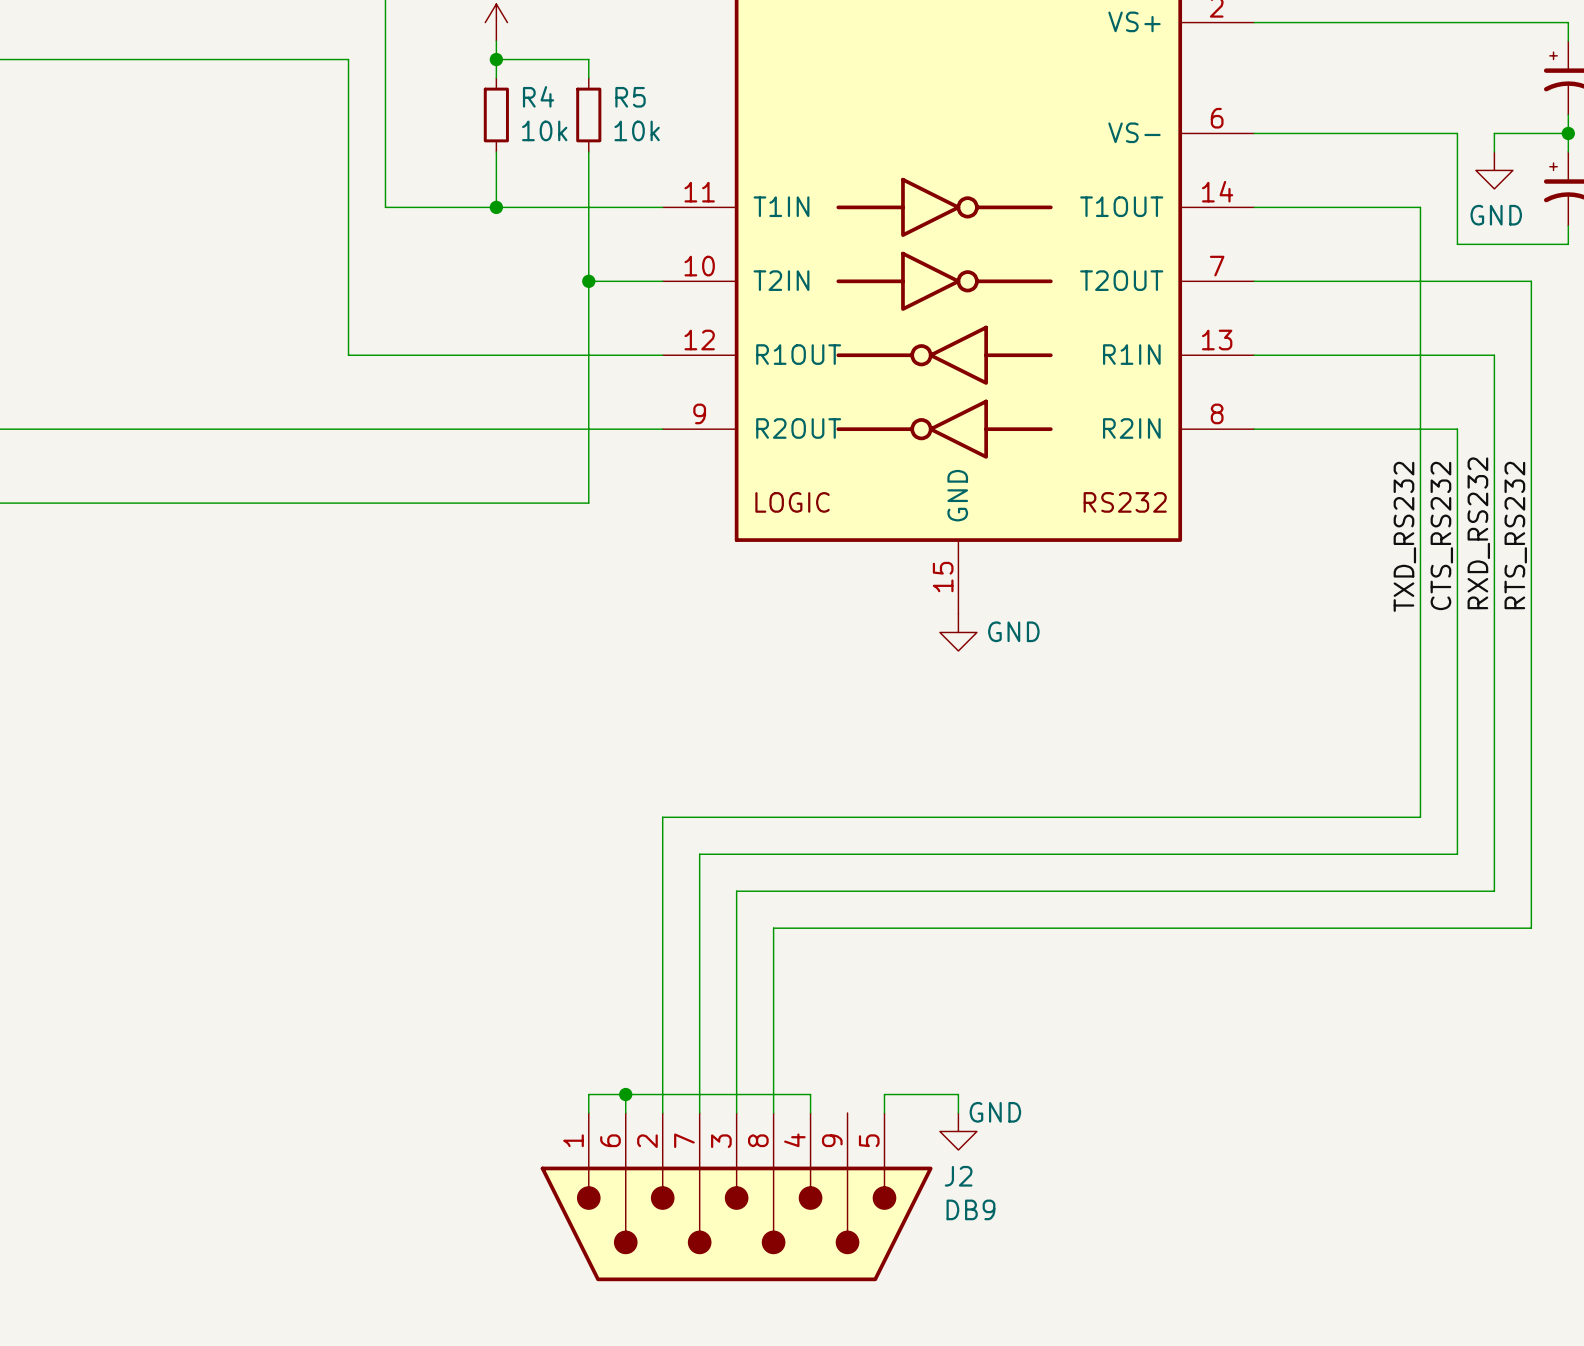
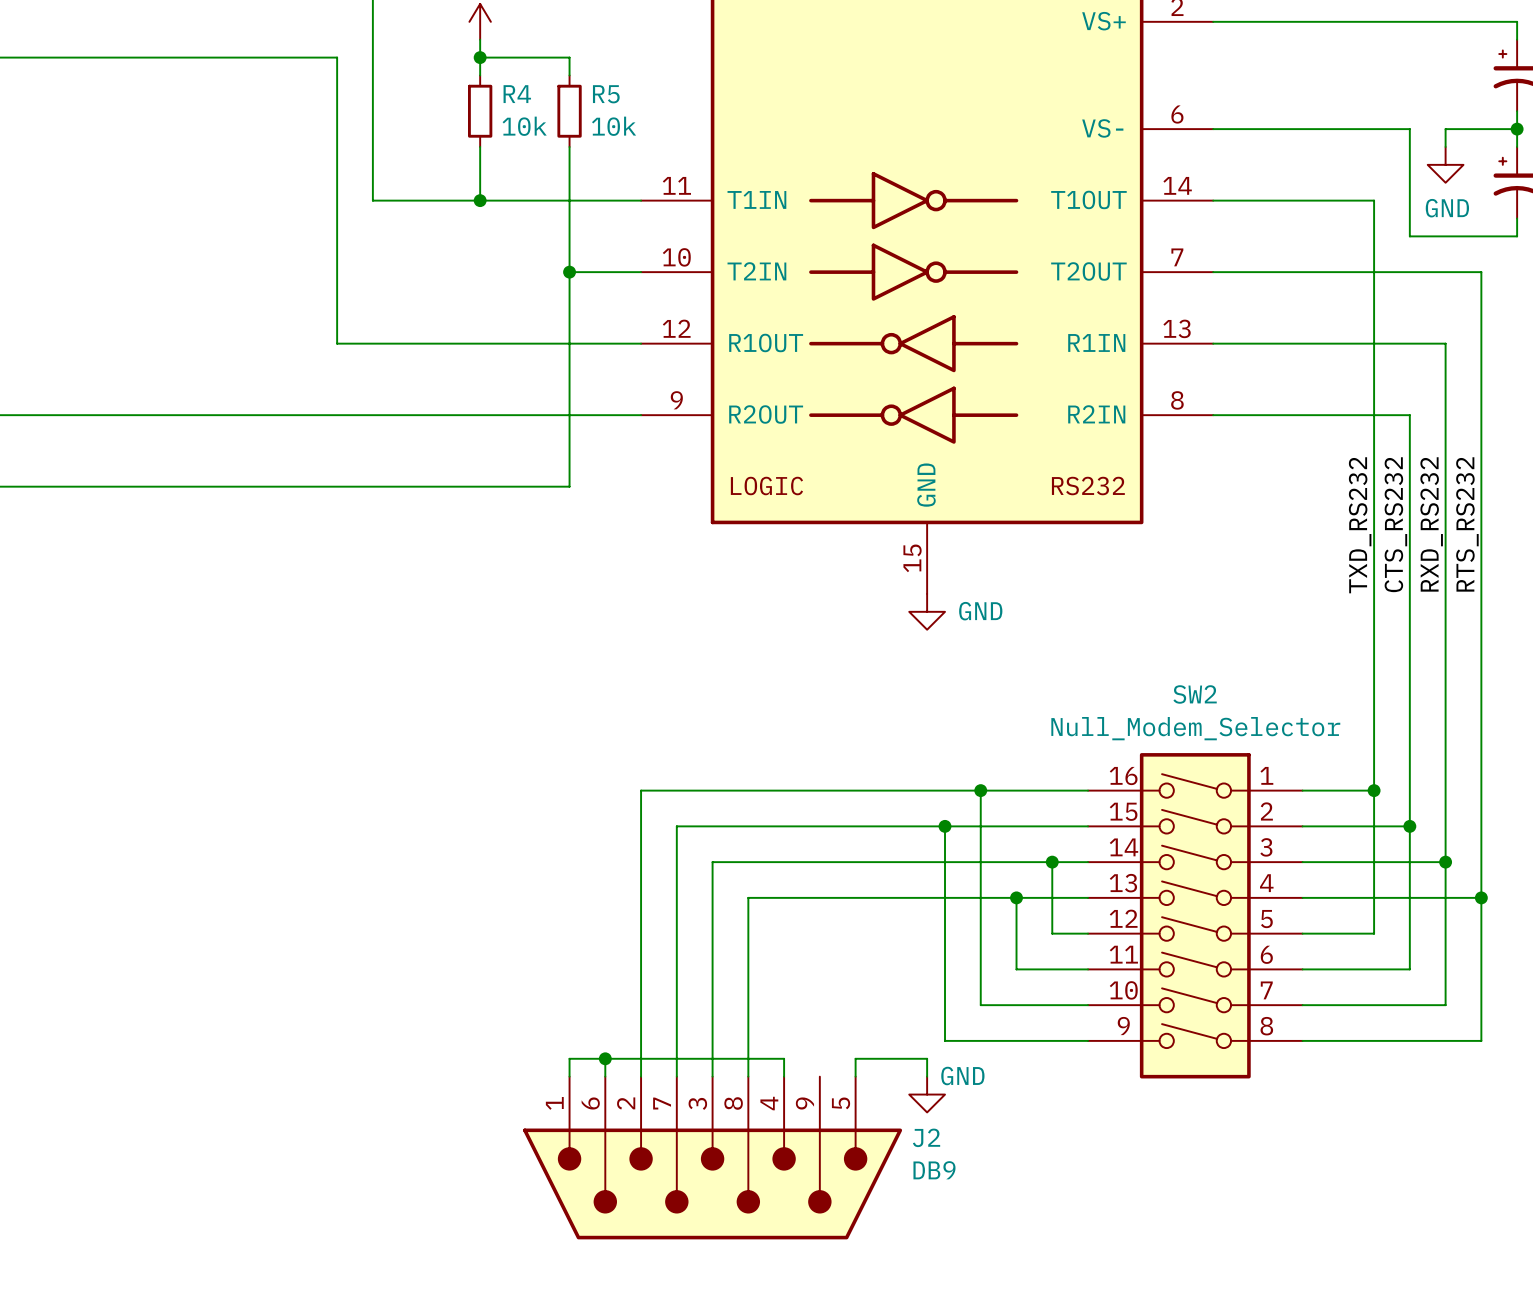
wire: none -> (980, 790) (980, 1005) (1088, 1005)
junction: none -> (980, 790)
wire: none -> (1374, 790) (1374, 933) (1302, 933)
junction: none -> (1374, 790)
wire: none -> (945, 826) (945, 1040) (1088, 1040)
junction: none -> (945, 826)
wire: none -> (1409, 826) (1409, 969) (1302, 969)
junction: none -> (1409, 826)
wire: none -> (1052, 862) (1052, 933) (1088, 933)
junction: none -> (1052, 862)
wire: none -> (1445, 862) (1445, 1005) (1302, 1005)
junction: none -> (1445, 862)
wire: none -> (1016, 897) (1016, 969) (1088, 969)
junction: none -> (1016, 897)
wire: none -> (1481, 897) (1481, 1040) (1302, 1040)
junction: none -> (1481, 897)
SW2: none -> Null_Modem_Selector (1195, 915)

